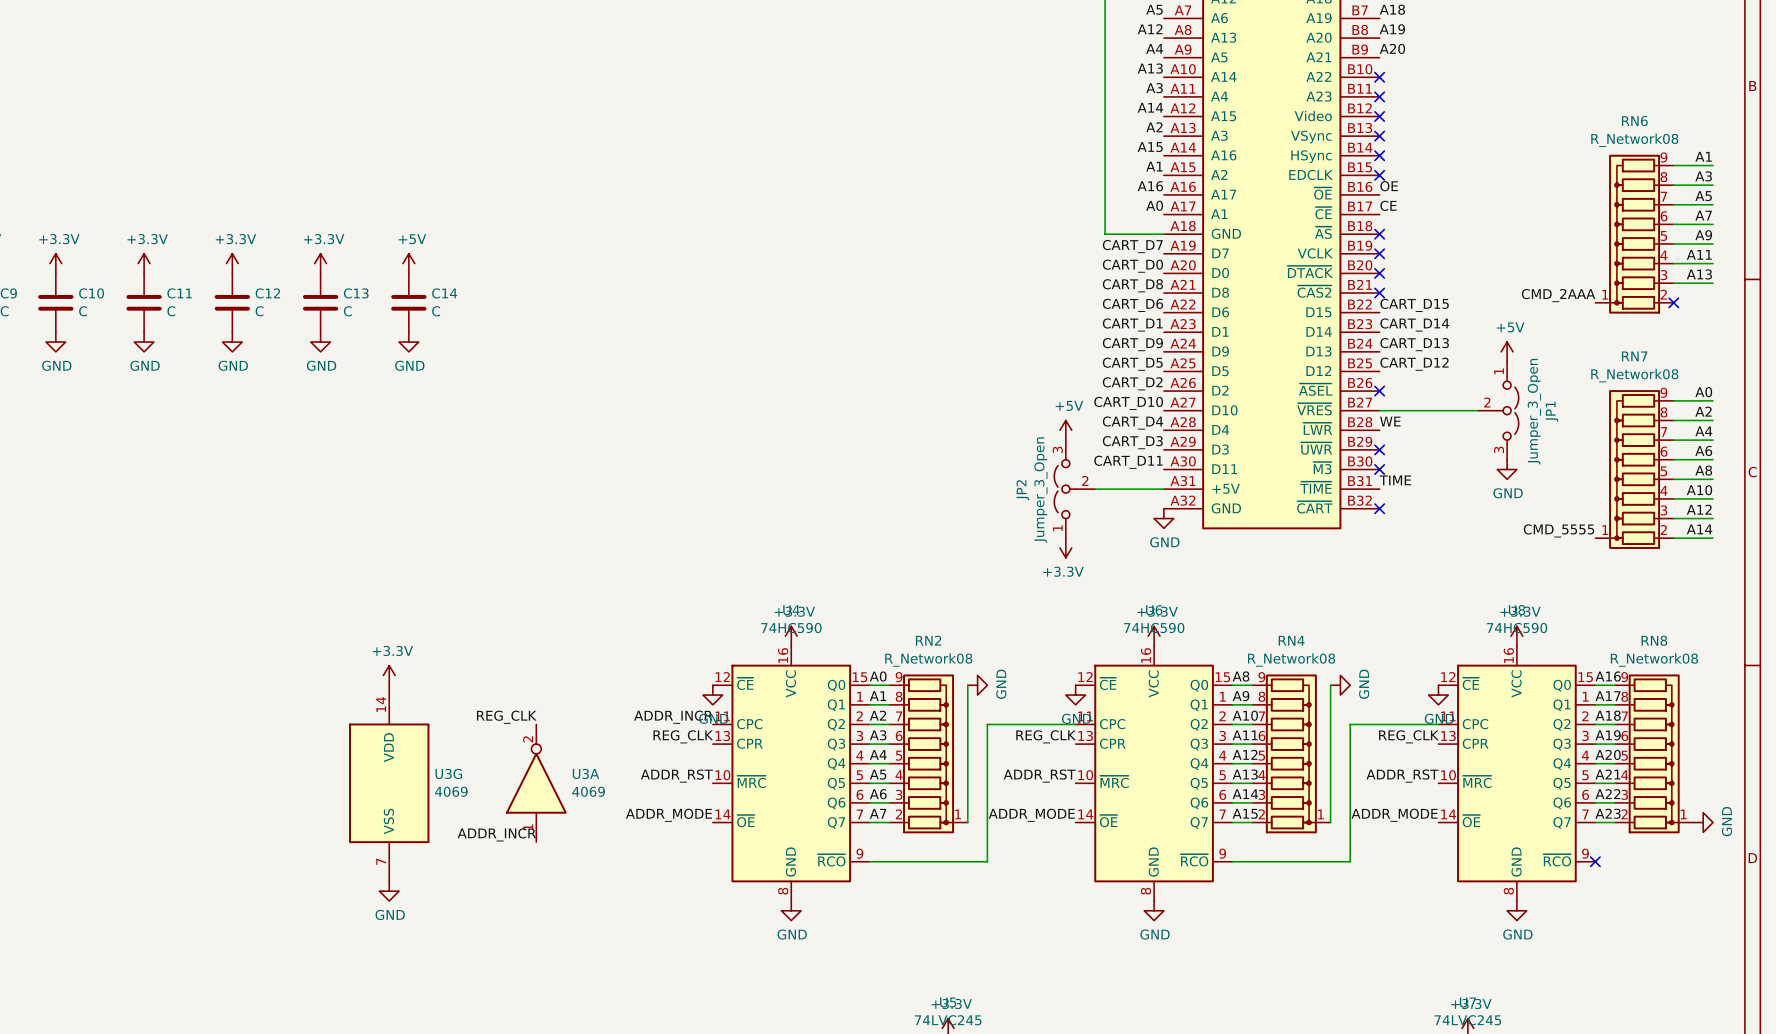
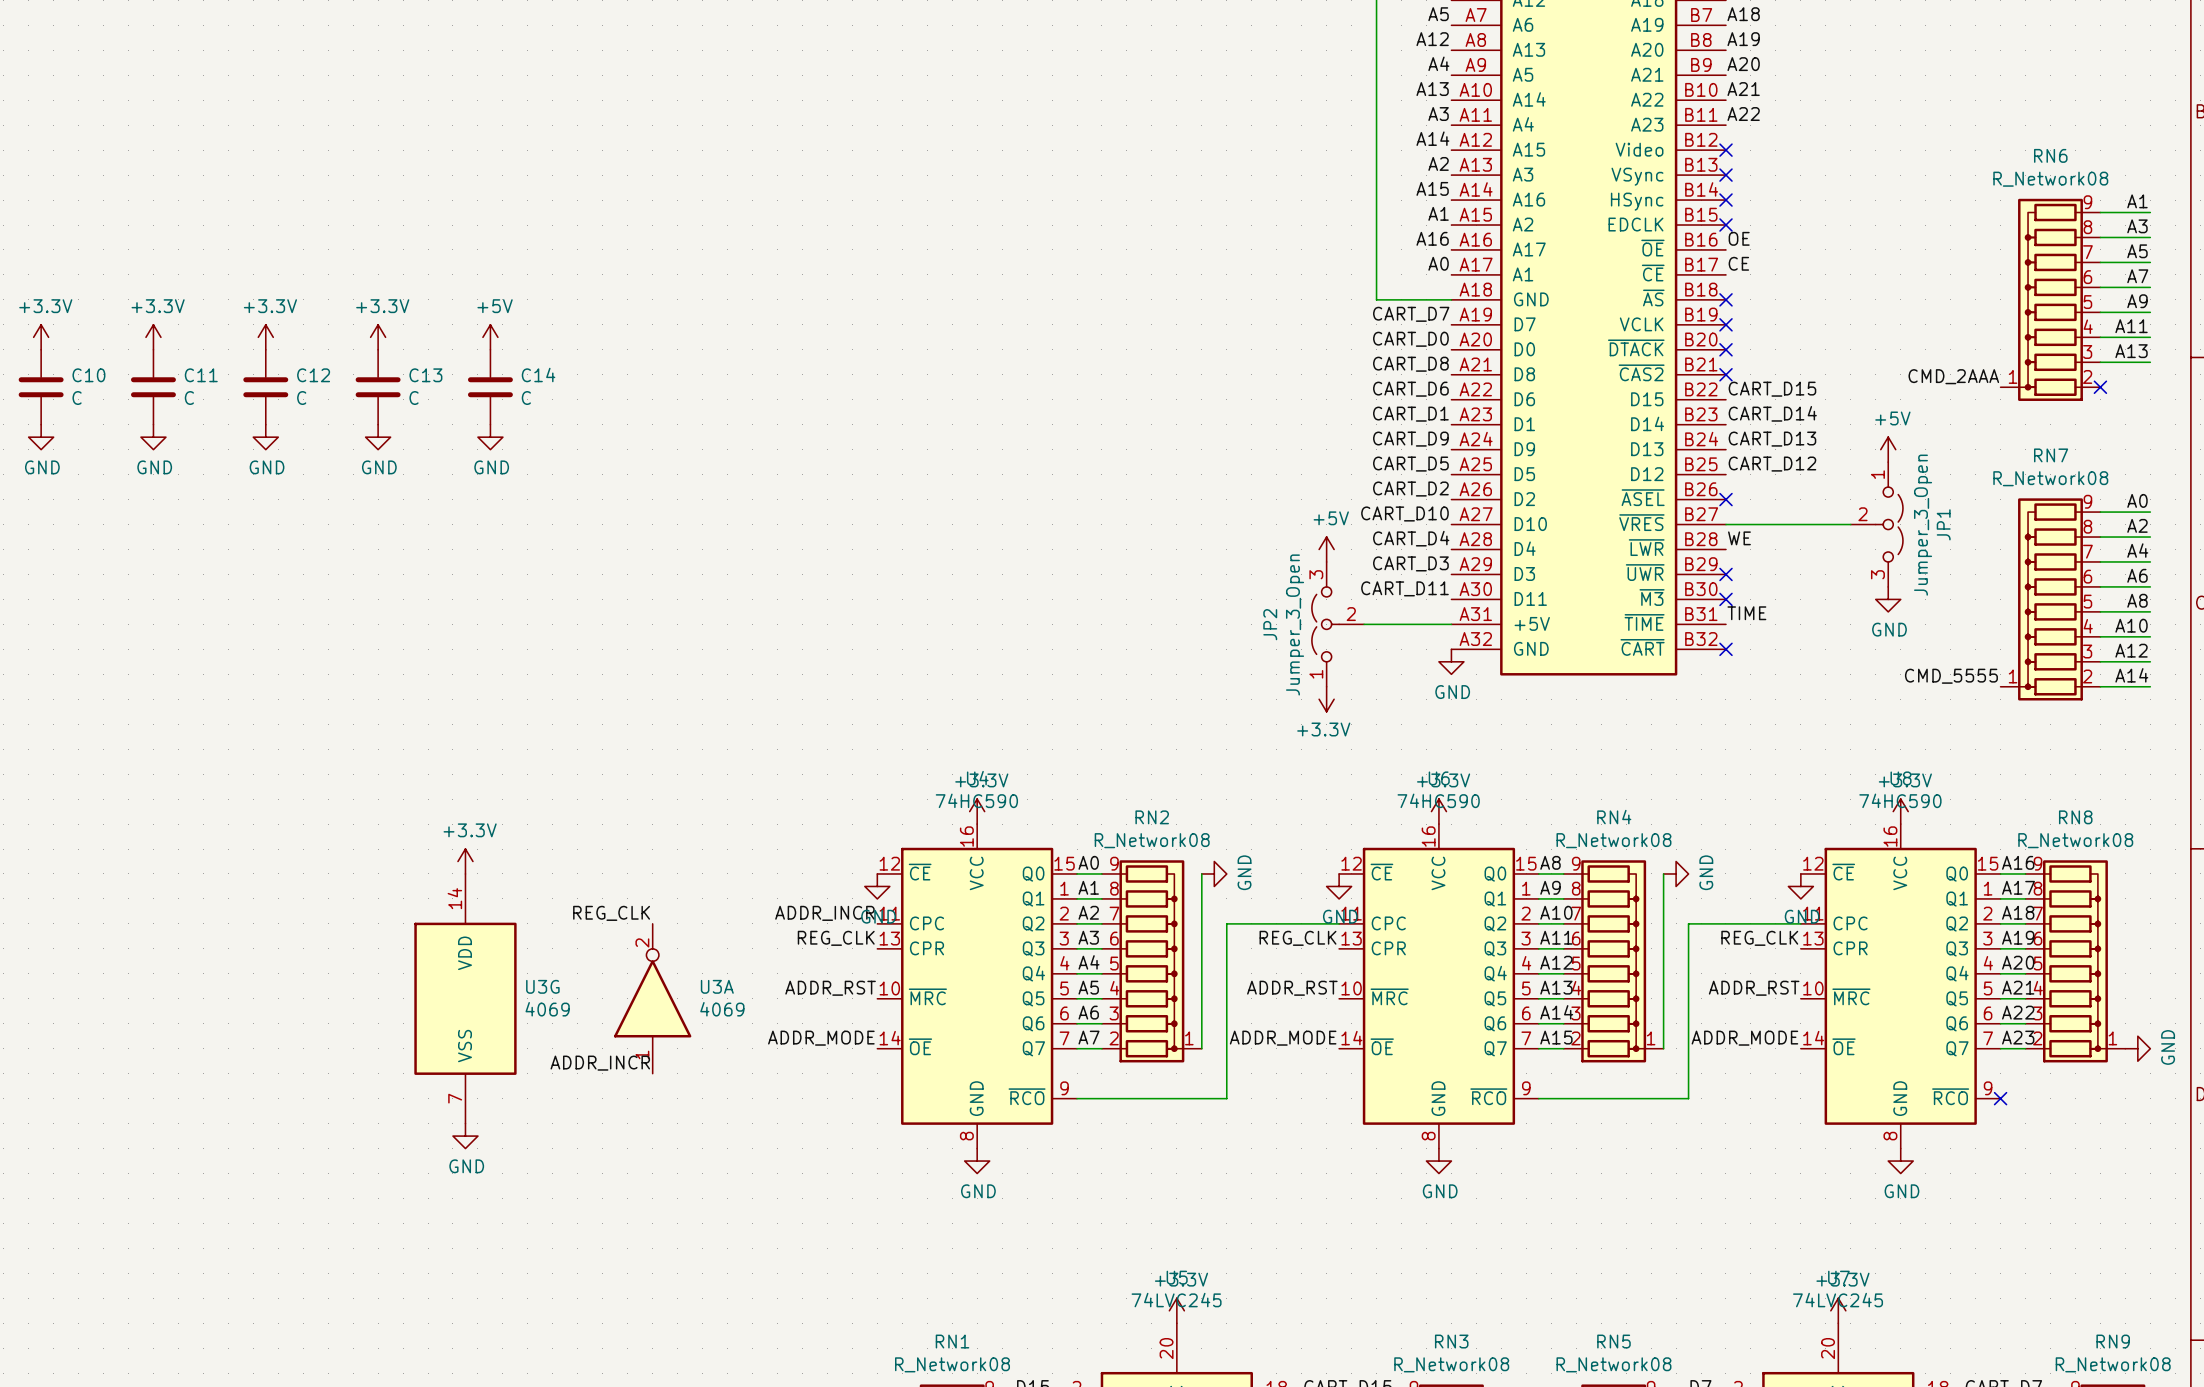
label: none -> A21 (1743, 89)
no-connect mark: (1379, 77) -> none
label: none -> A22 (1743, 114)
no-connect mark: (1379, 96) -> none

